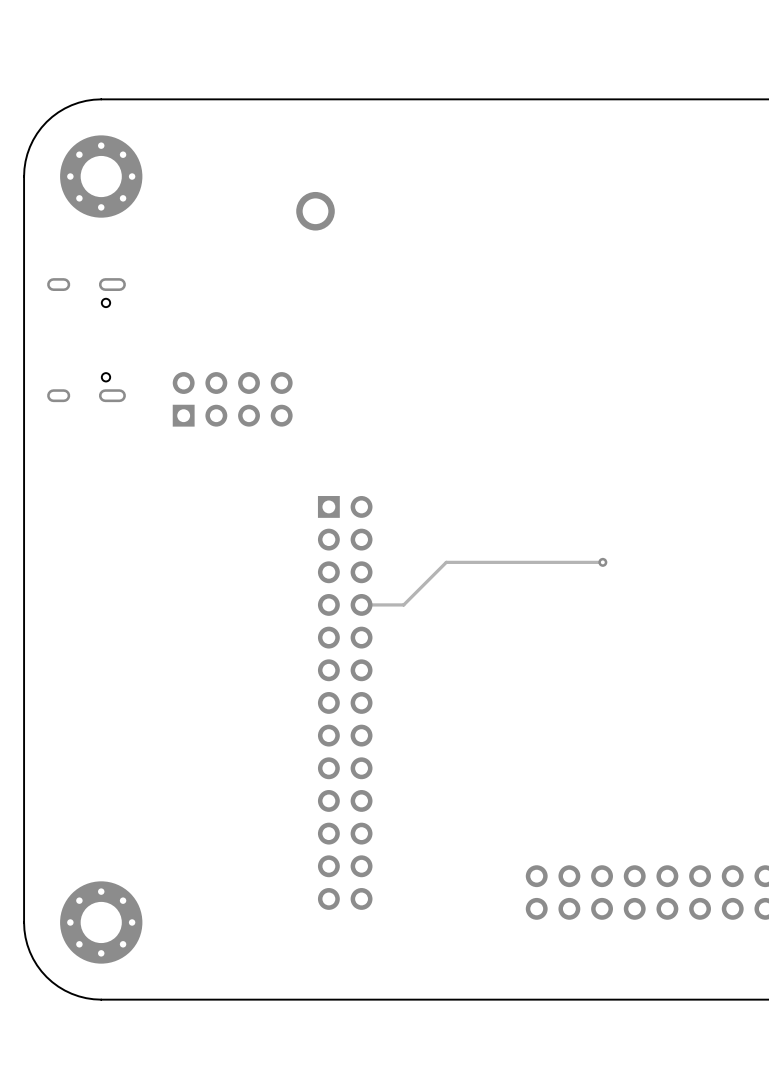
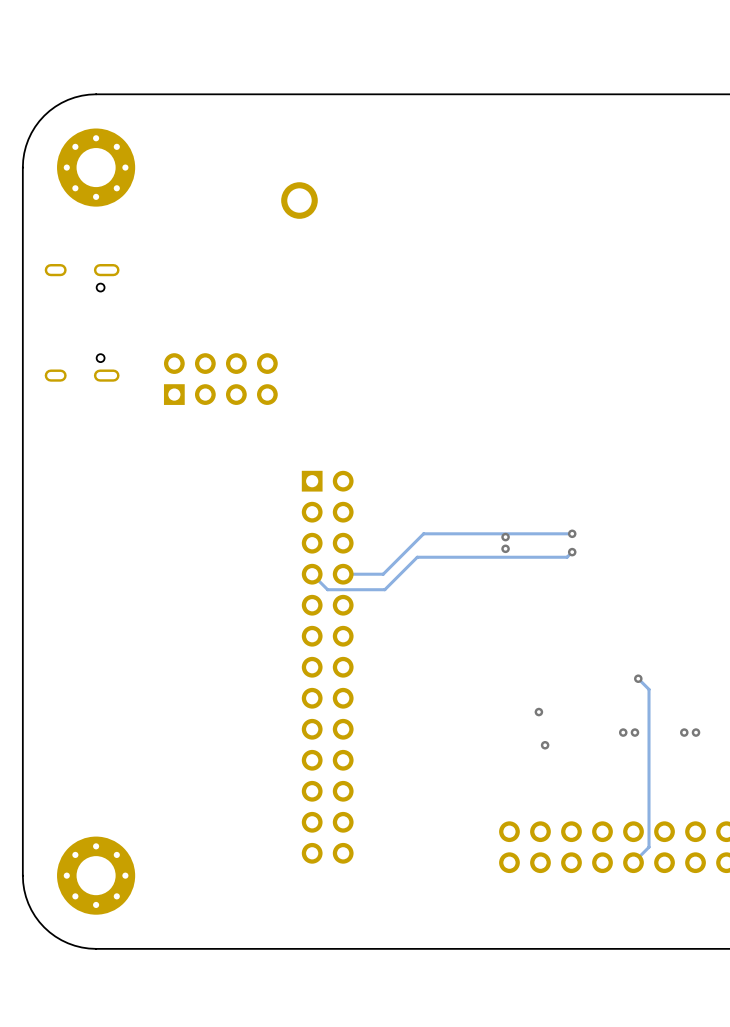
via: none -> (505, 537)
via: none -> (505, 548)
track: none -> (572, 552) (567, 557) (417, 557) (384, 589) (327, 589) (312, 574)
via: none -> (572, 552)
track: none -> (638, 678) (649, 689) (649, 847) (633, 862)
via: none -> (638, 678)
via: none -> (538, 712)
via: none -> (623, 732)
via: none -> (634, 732)
via: none -> (684, 732)
via: none -> (696, 732)
via: none -> (545, 745)

